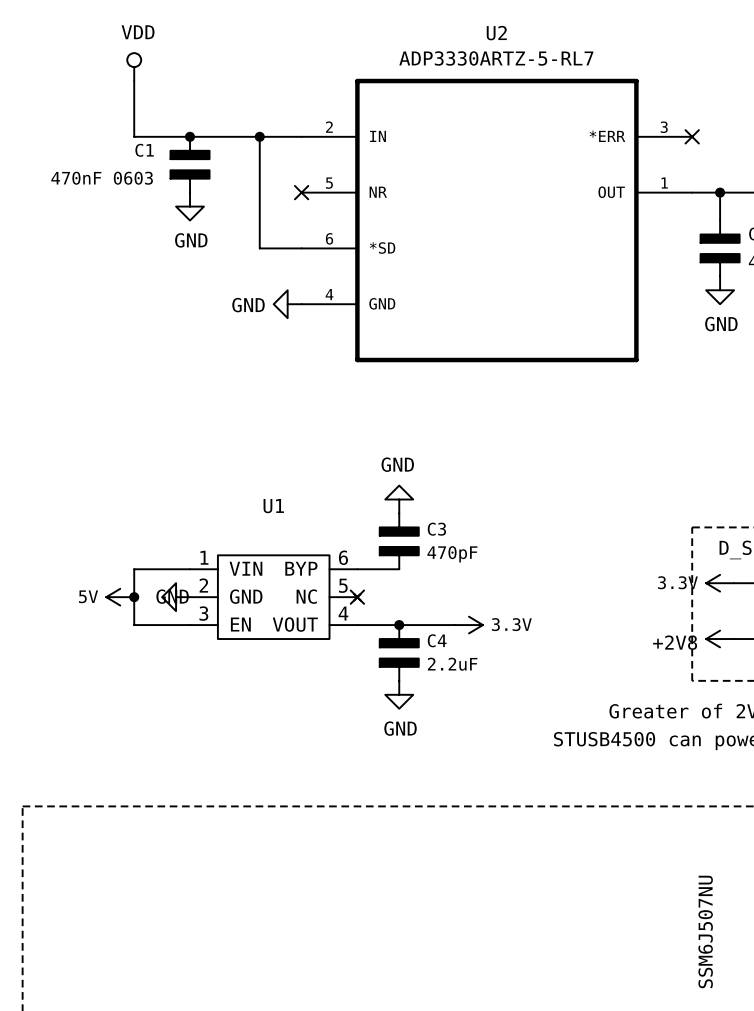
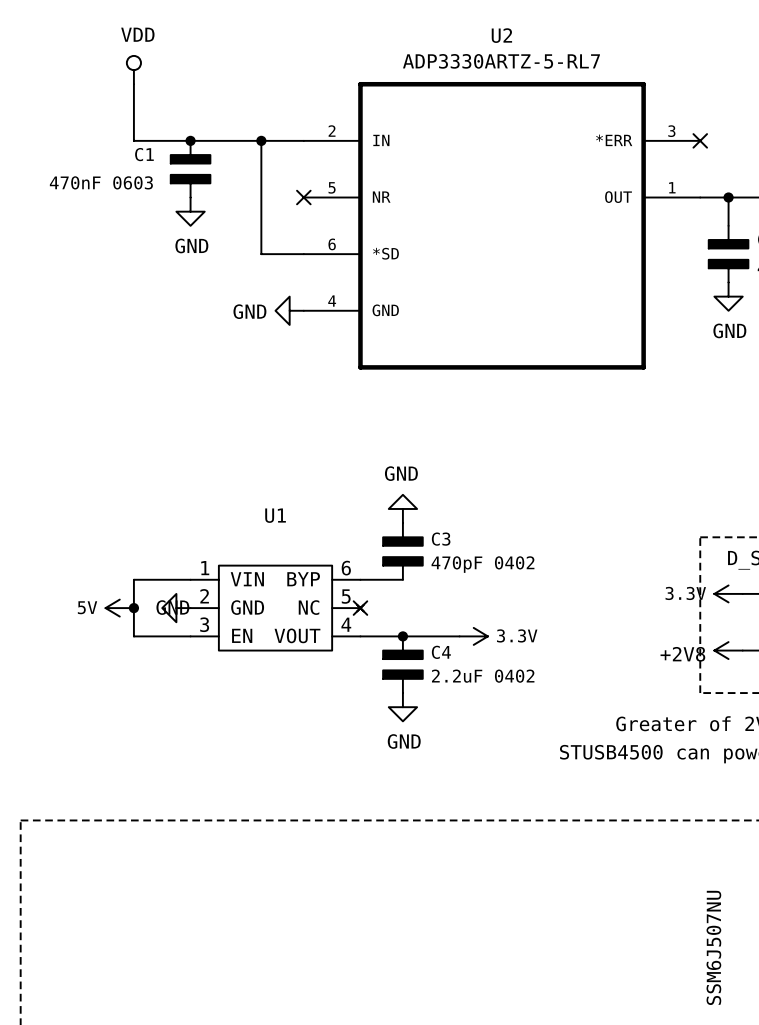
C3 value: 470pF (452, 554) -> 470pF 0402 (482, 564)
C4 value: 2.2uF (452, 664) -> 2.2uF 0402 (483, 676)

